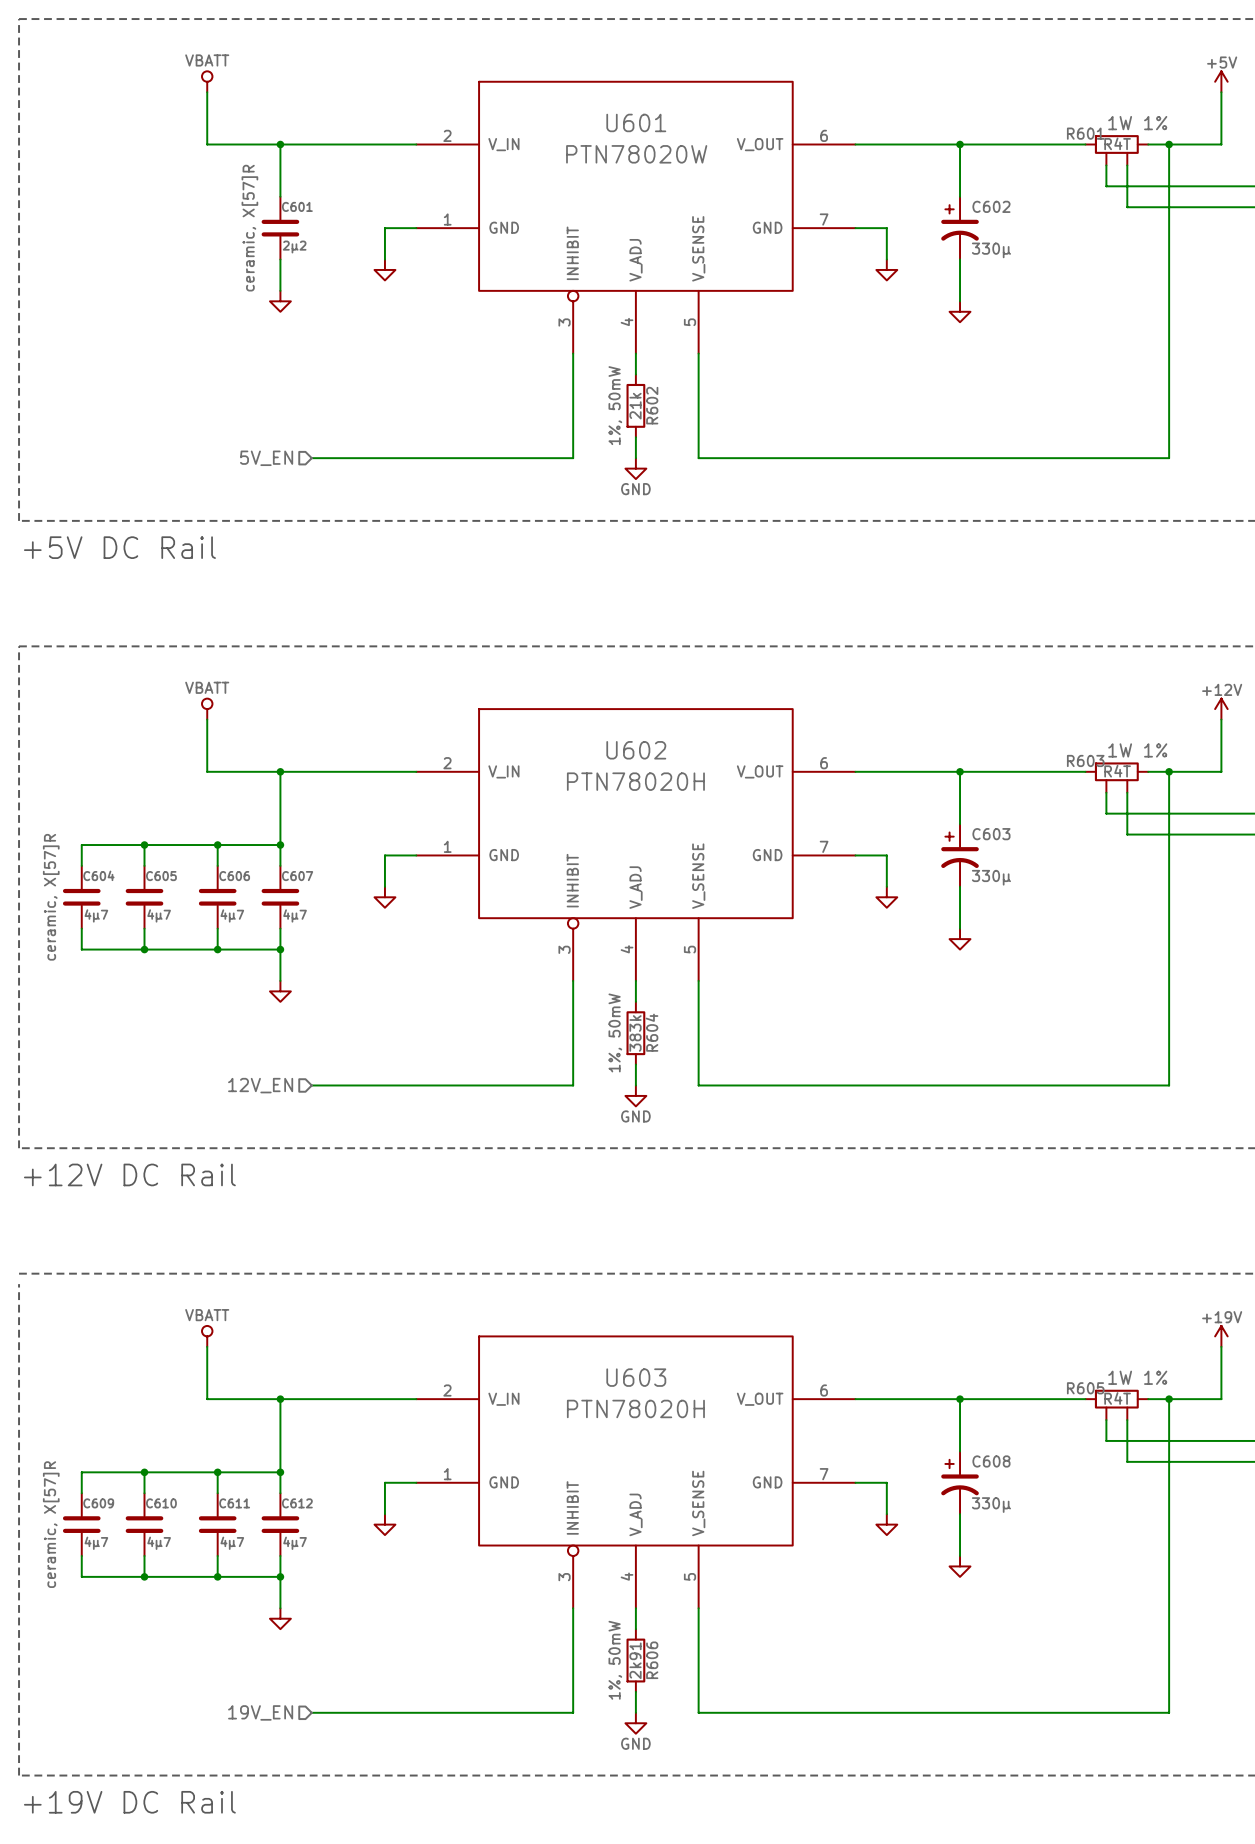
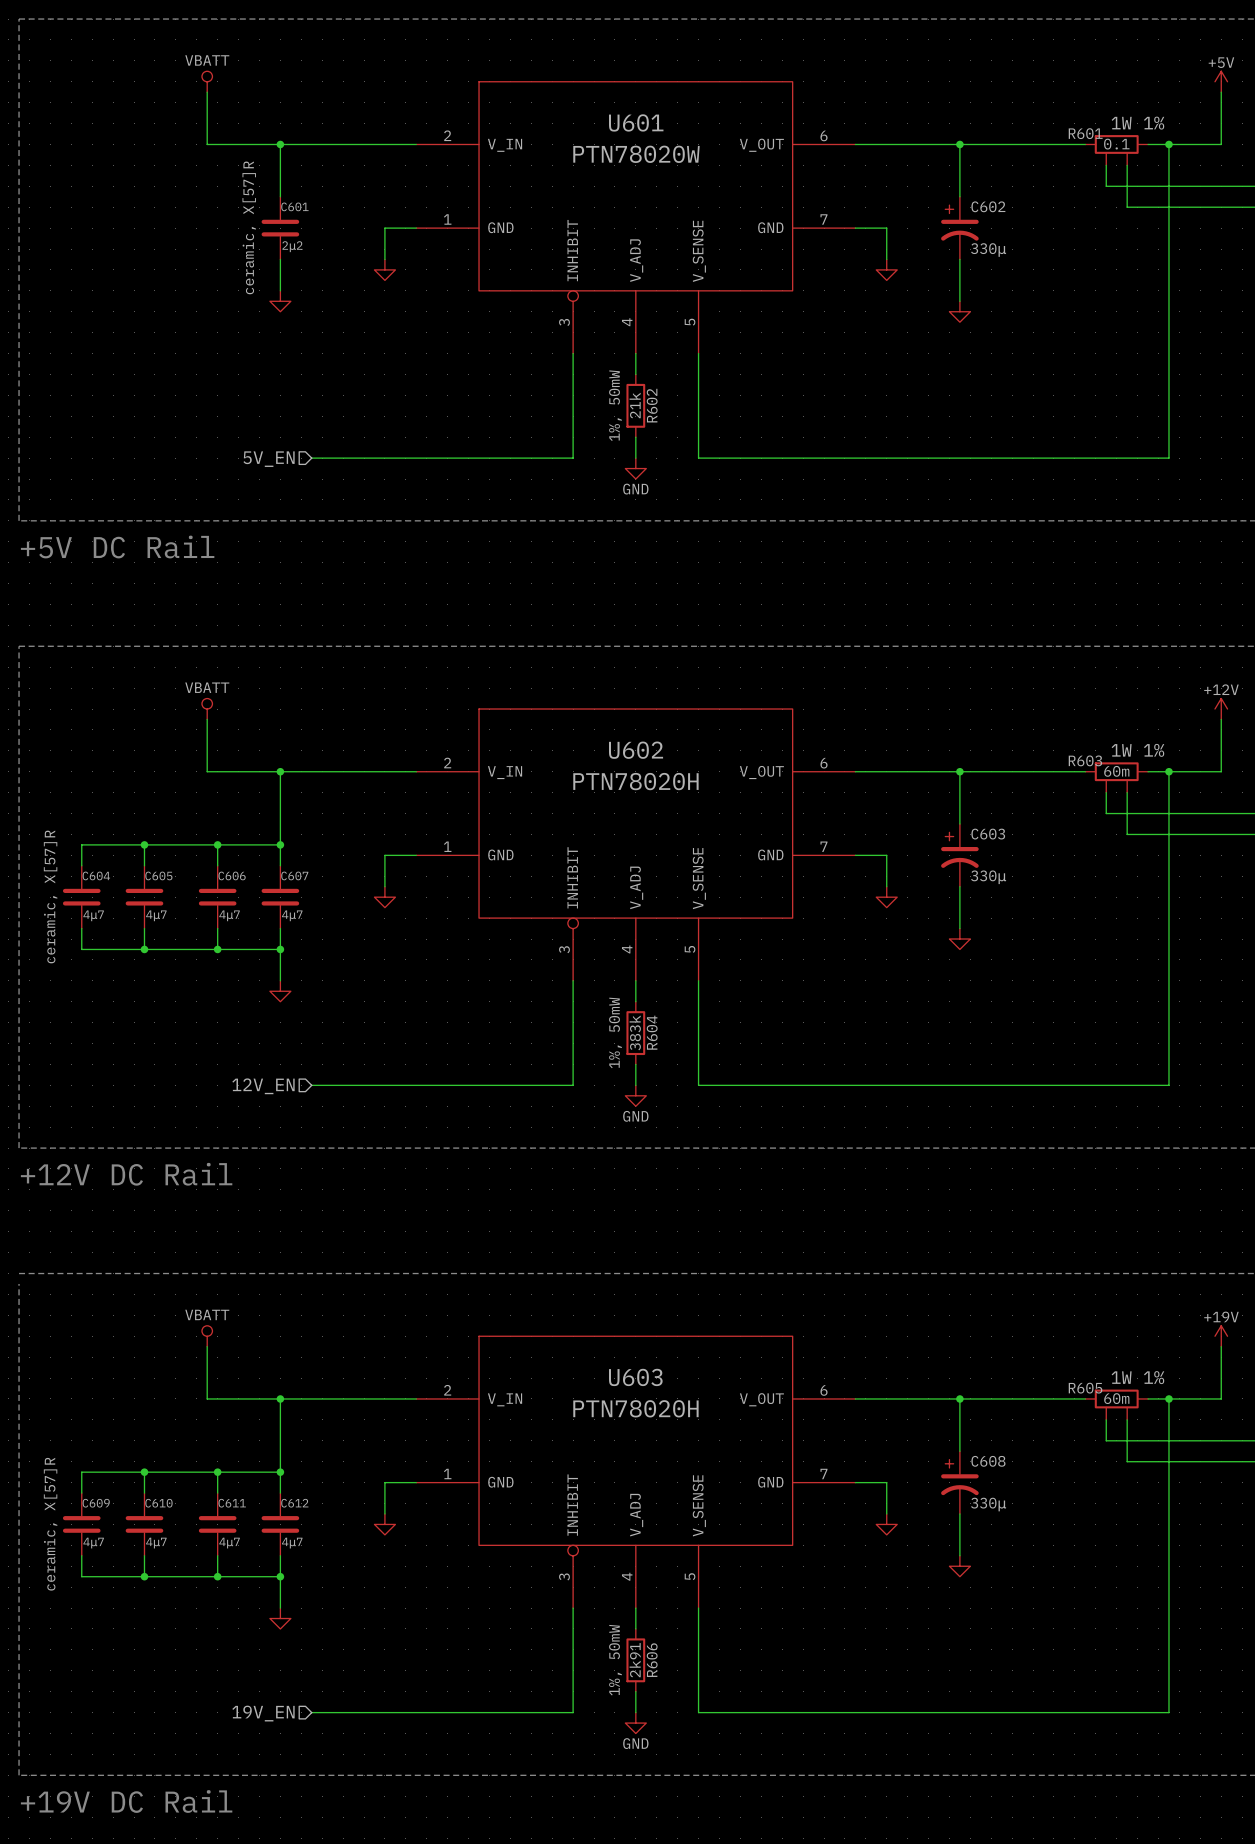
R601 value: R4T (1117, 143) -> 0.1 (1116, 144)
R603 value: R4T (1117, 771) -> 60m (1116, 771)
R605 value: R4T (1117, 1398) -> 60m (1116, 1398)

